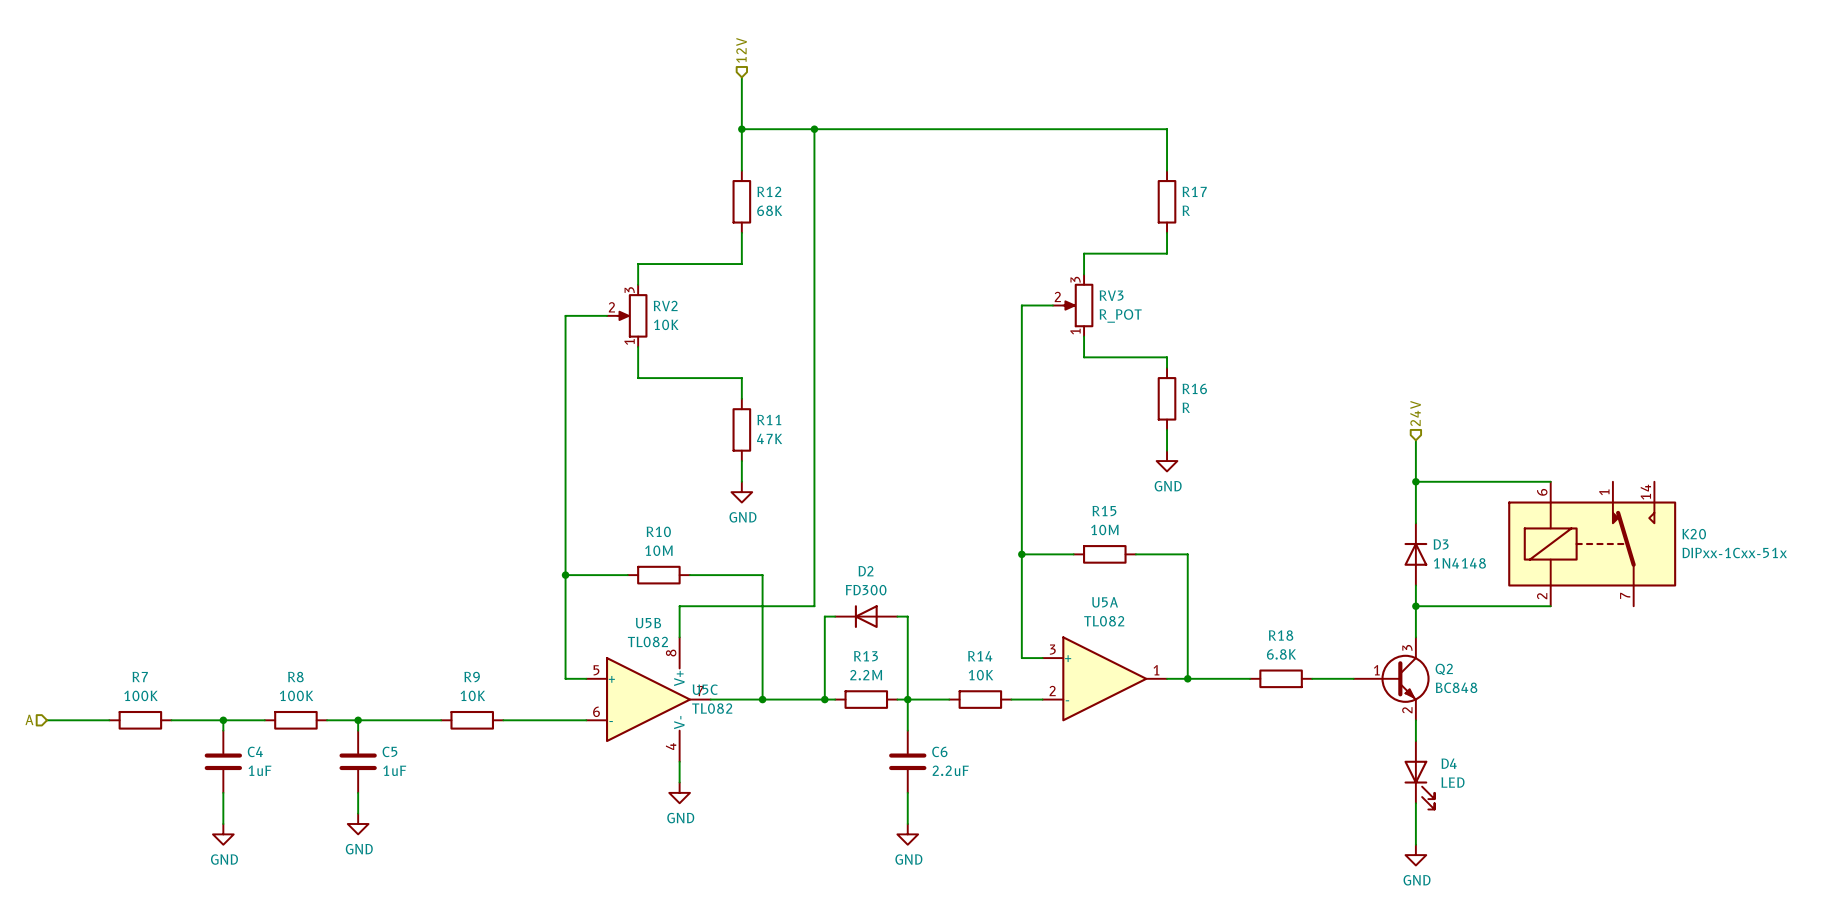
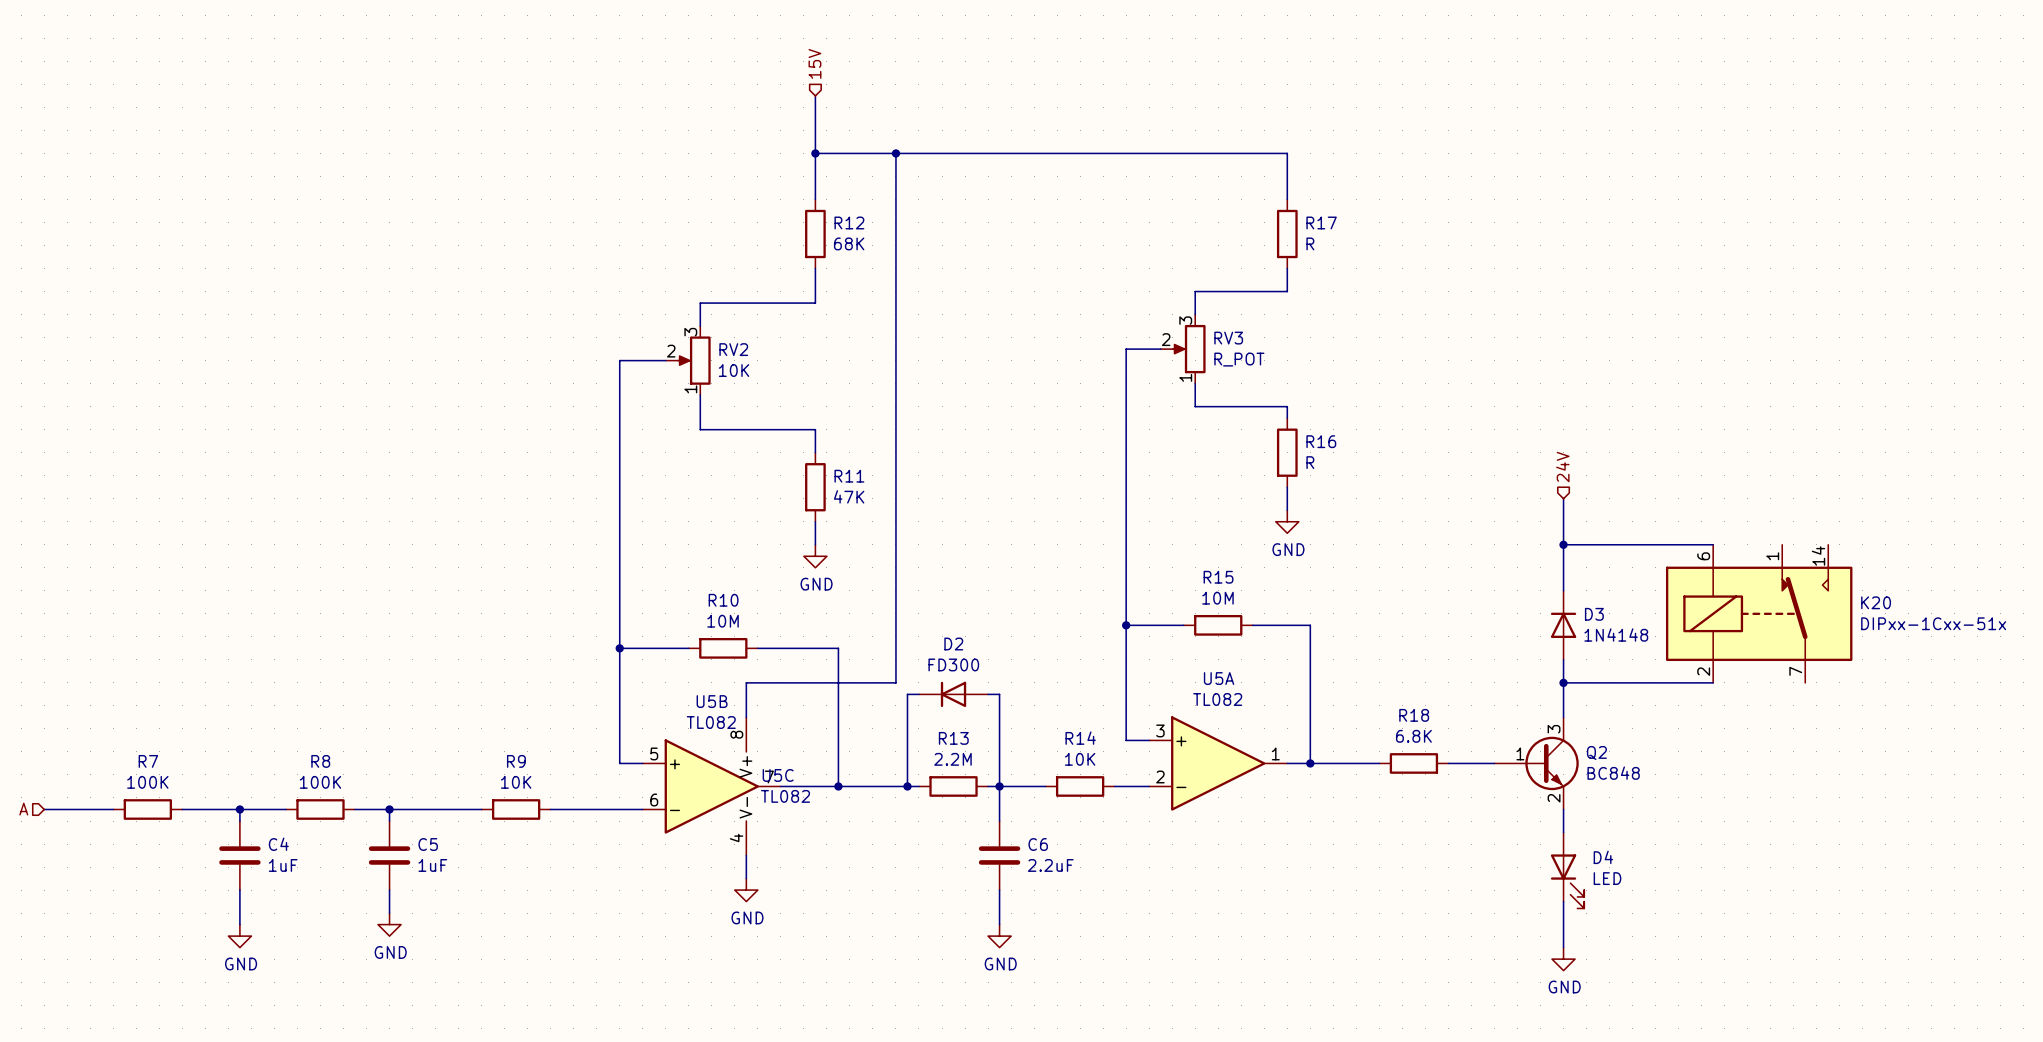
hierarchical label: 12V (741, 50) -> 15V (814, 63)

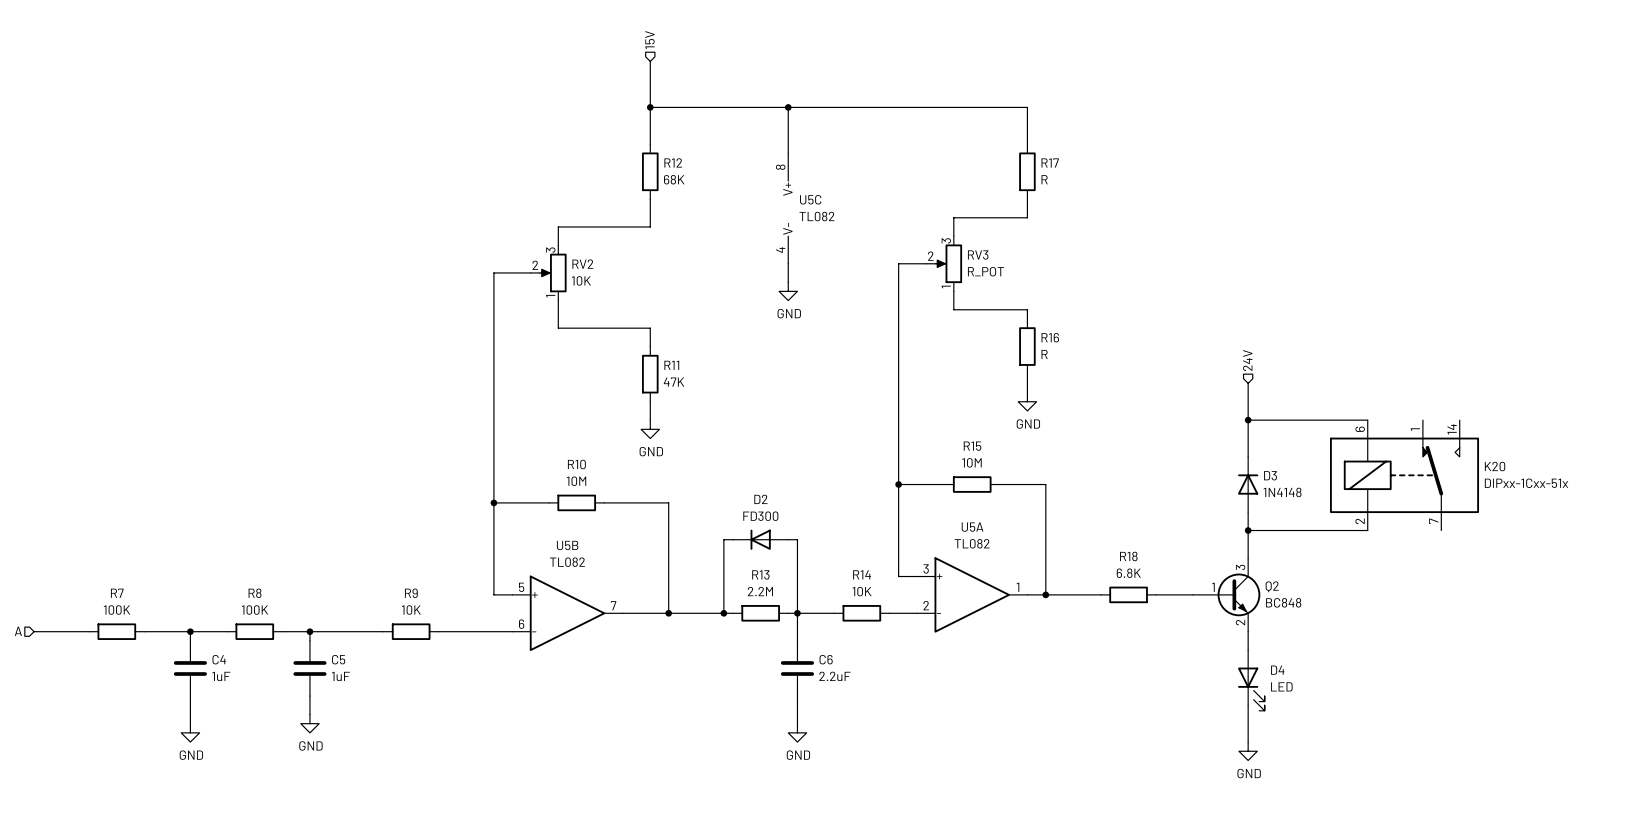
wire: (895, 153) (895, 682) (746, 682) (746, 717) -> none
junction: (895, 153) -> none
wire: none -> (788, 107) (788, 153)
junction: none -> (788, 107)
wire: none -> (788, 263) (788, 282)
power symbol: none -> GND (788, 291)
U5C position: (746, 786) -> (788, 208)
wire: (746, 855) (746, 878) -> none
power symbol: GND (746, 890) -> none

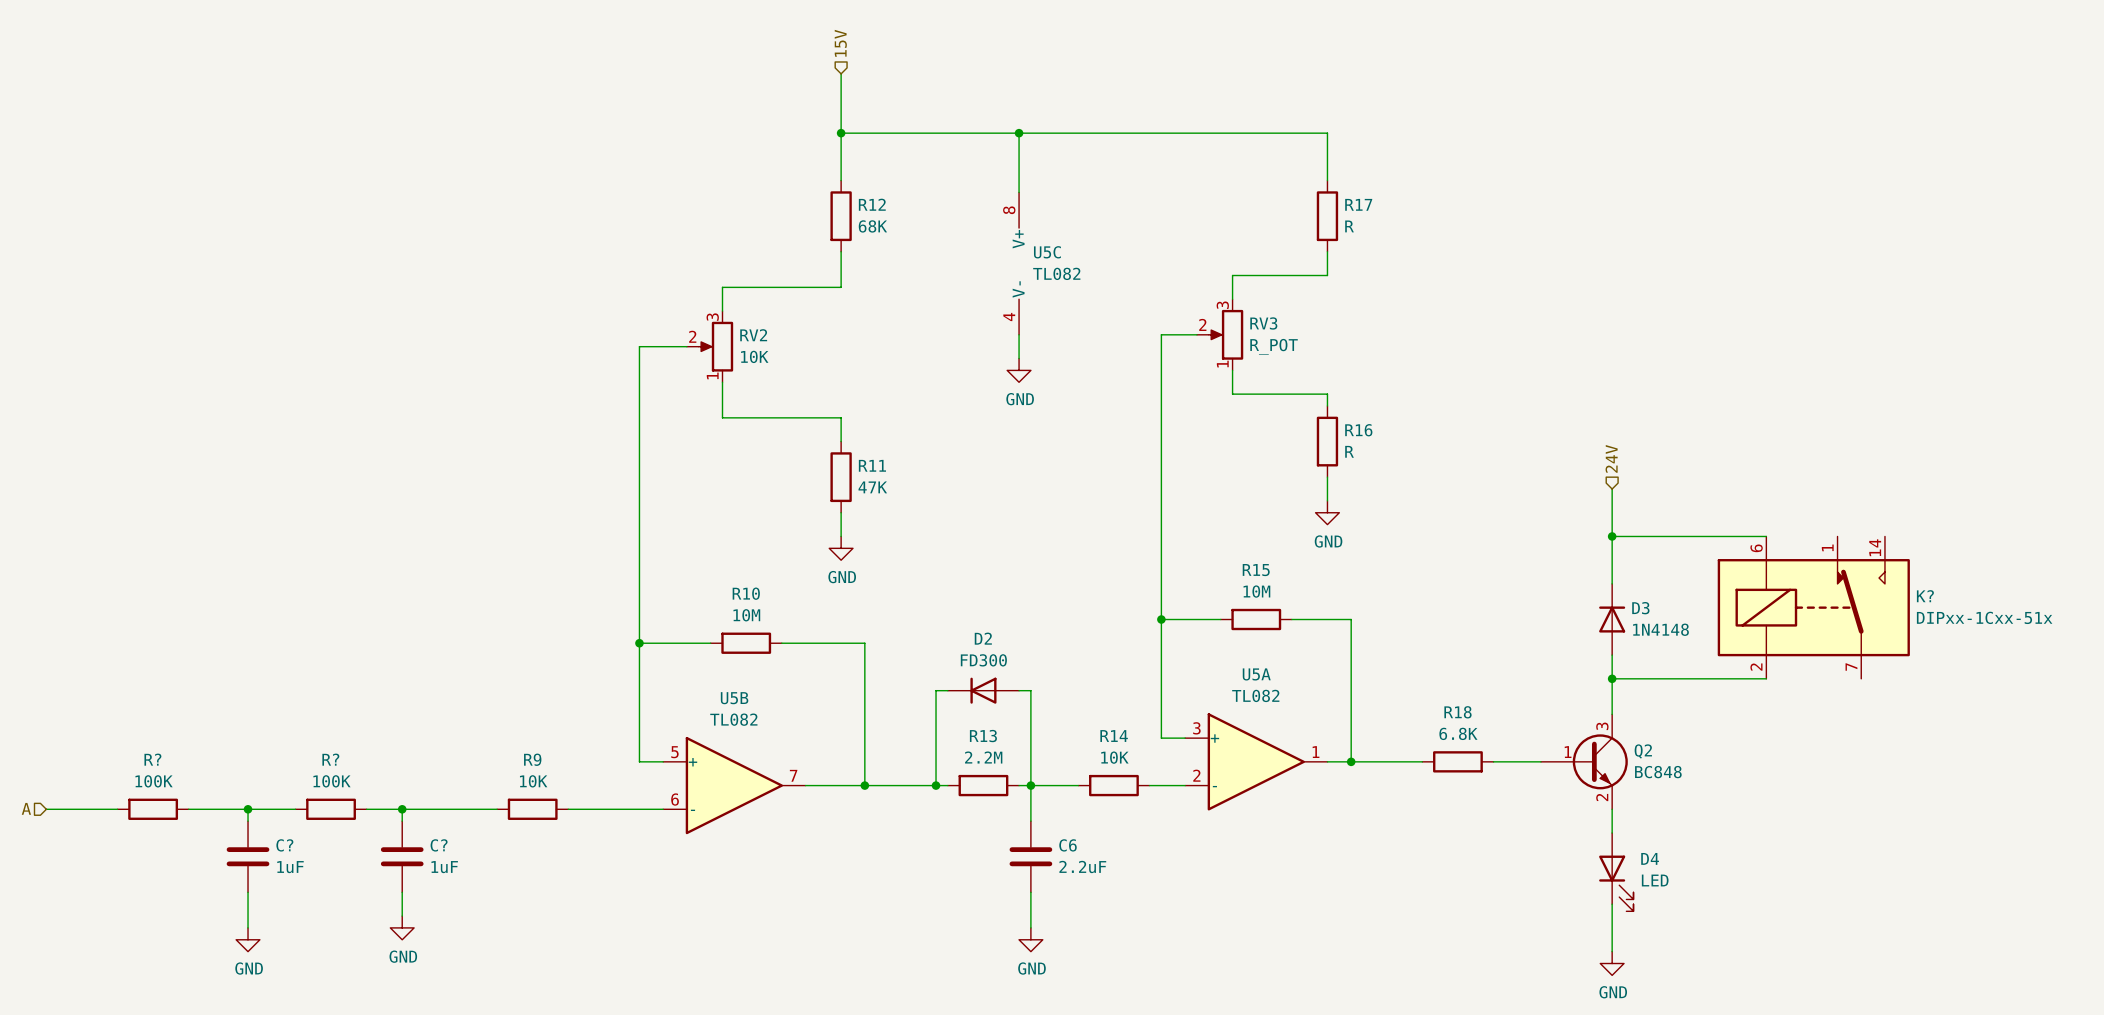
K20 name: K20 (1495, 466) -> K? (1925, 596)
R7 name: R7 (117, 593) -> R? (152, 759)
R8 name: R8 (255, 593) -> R? (330, 759)
C4 name: C4 (219, 659) -> C? (284, 845)
C5 name: C5 (338, 659) -> C? (439, 845)

